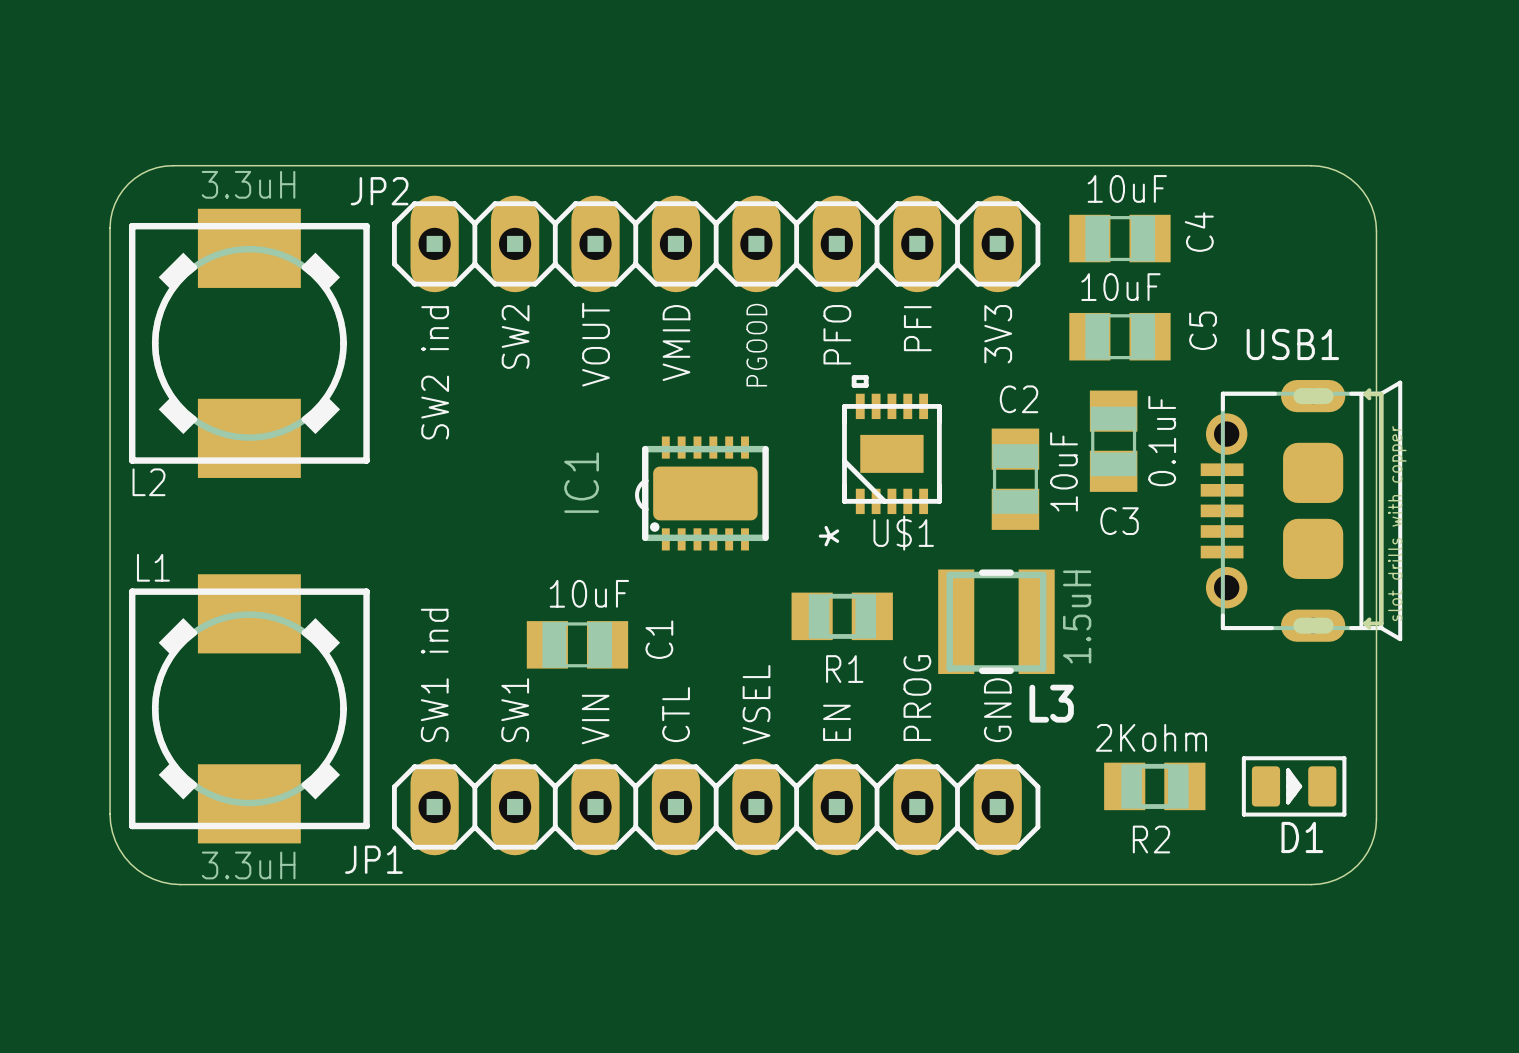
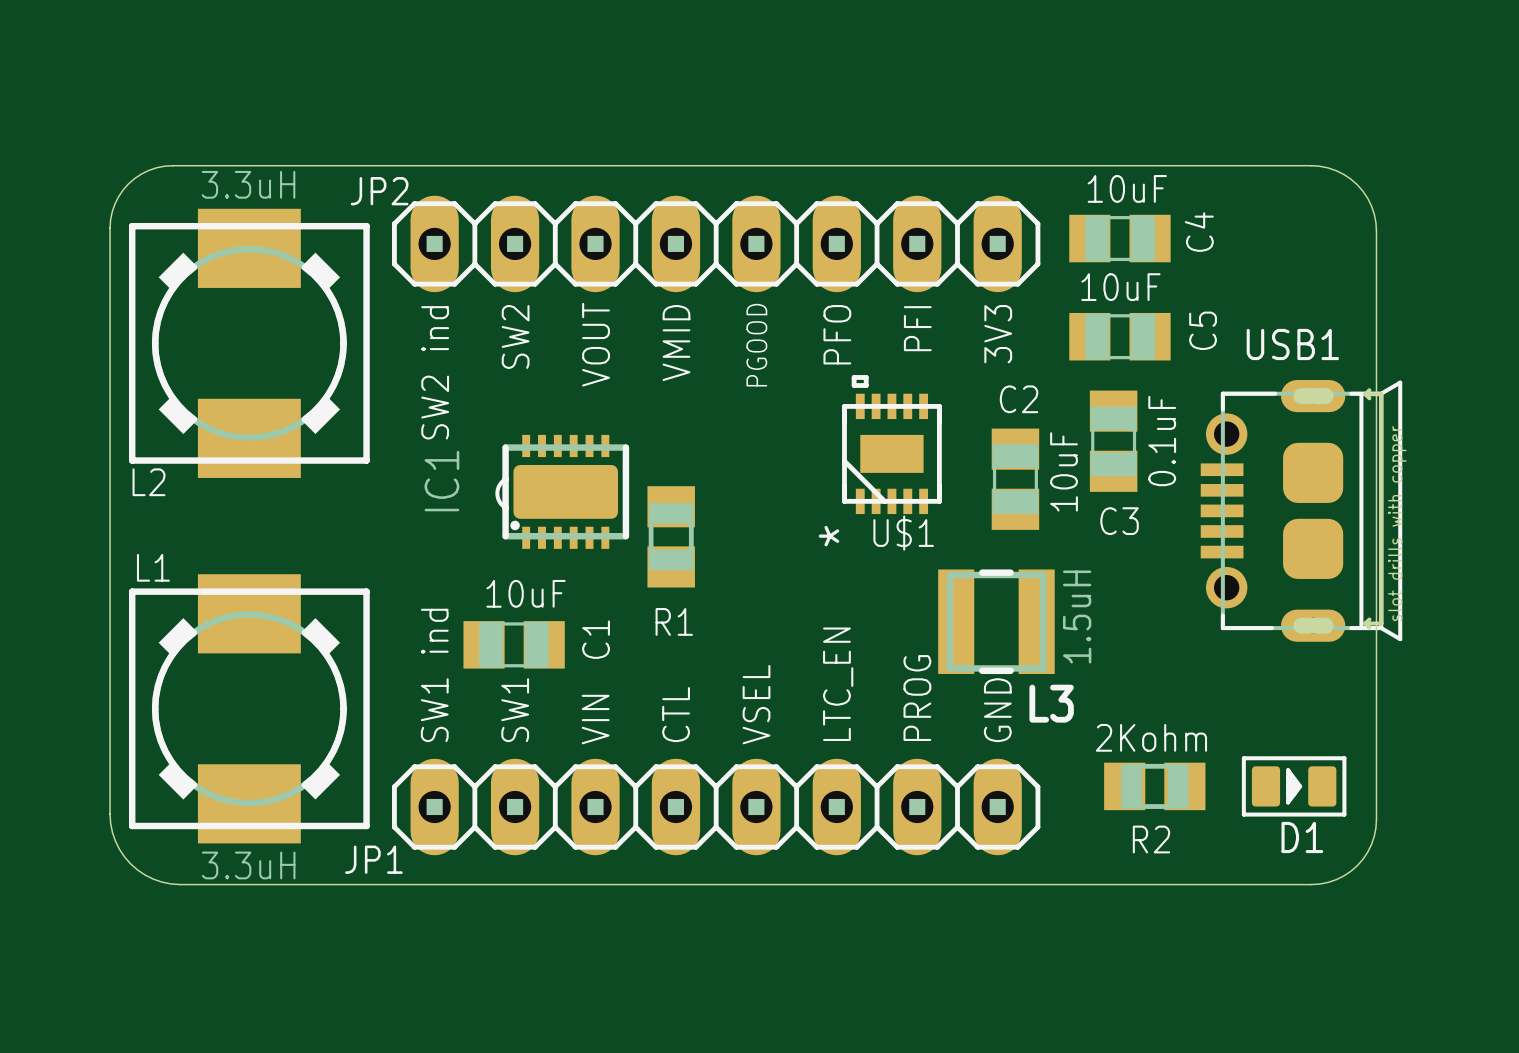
IC1 position: (701, 493) -> (562, 491)
R1 rotation: 0° (842, 616) -> 90° clockwise (671, 536)
R1 position: (842, 616) -> (671, 536)
C1 position: (577, 644) -> (514, 644)
text: EN (836, 722) -> LTC_EN (838, 684)

